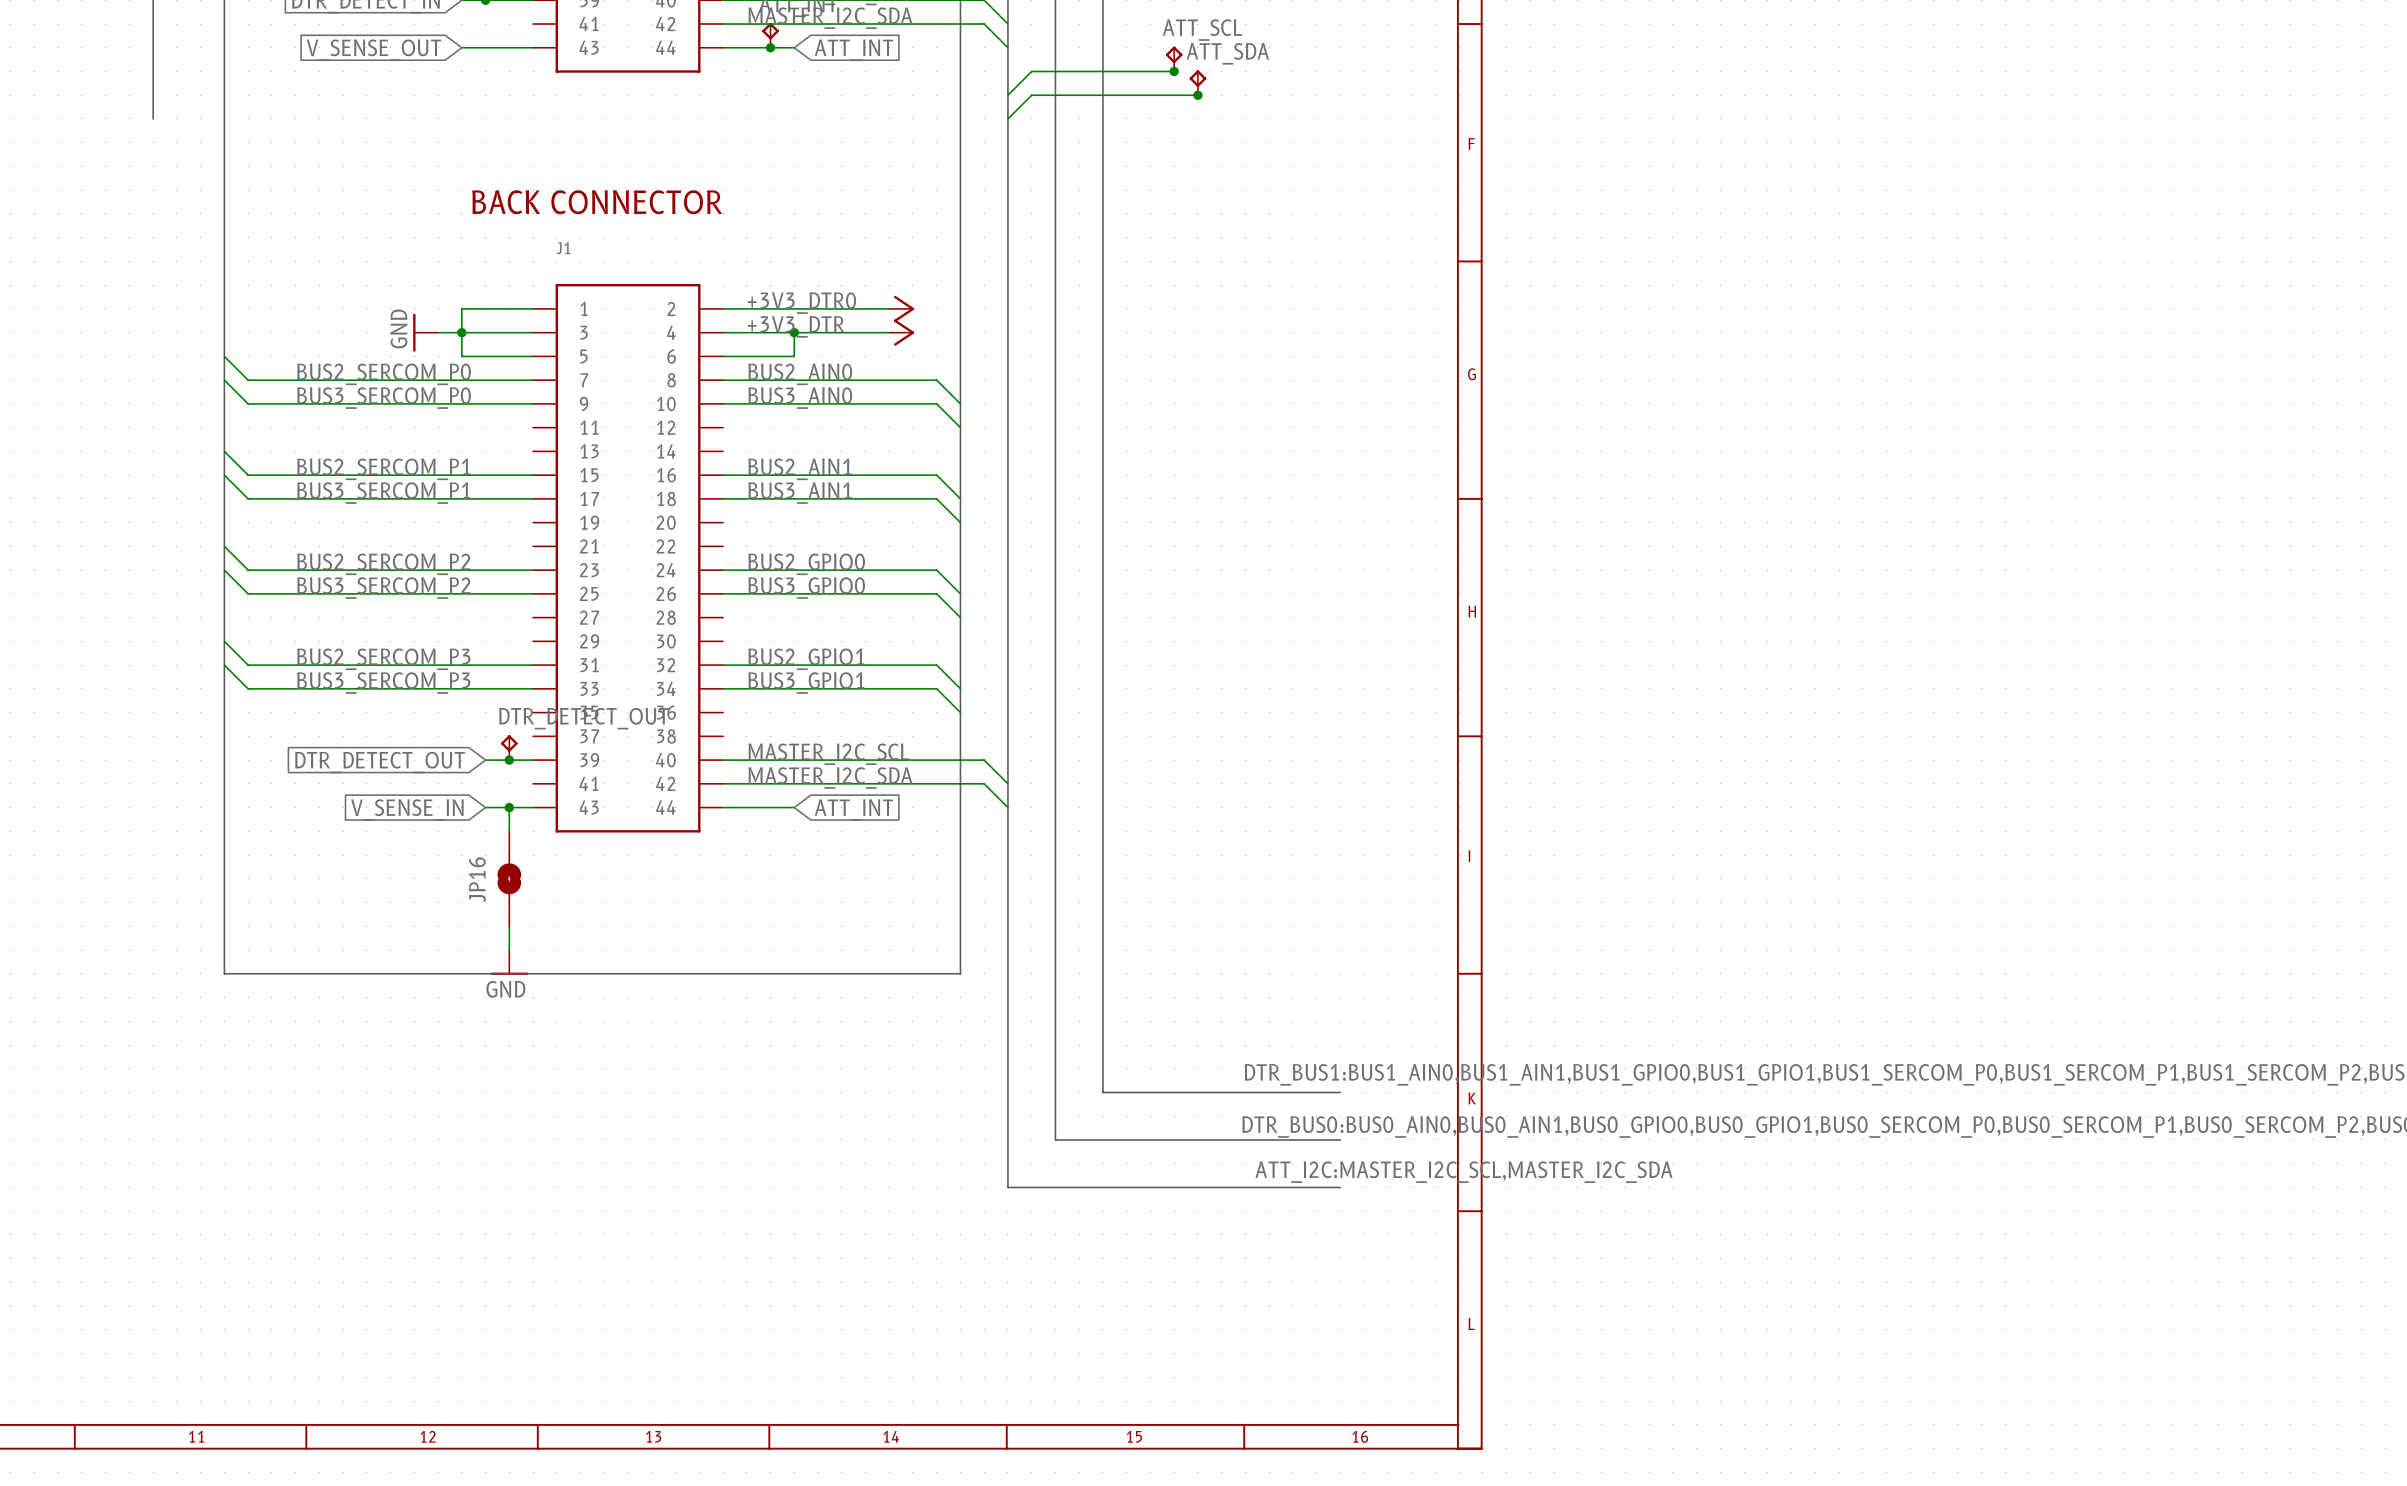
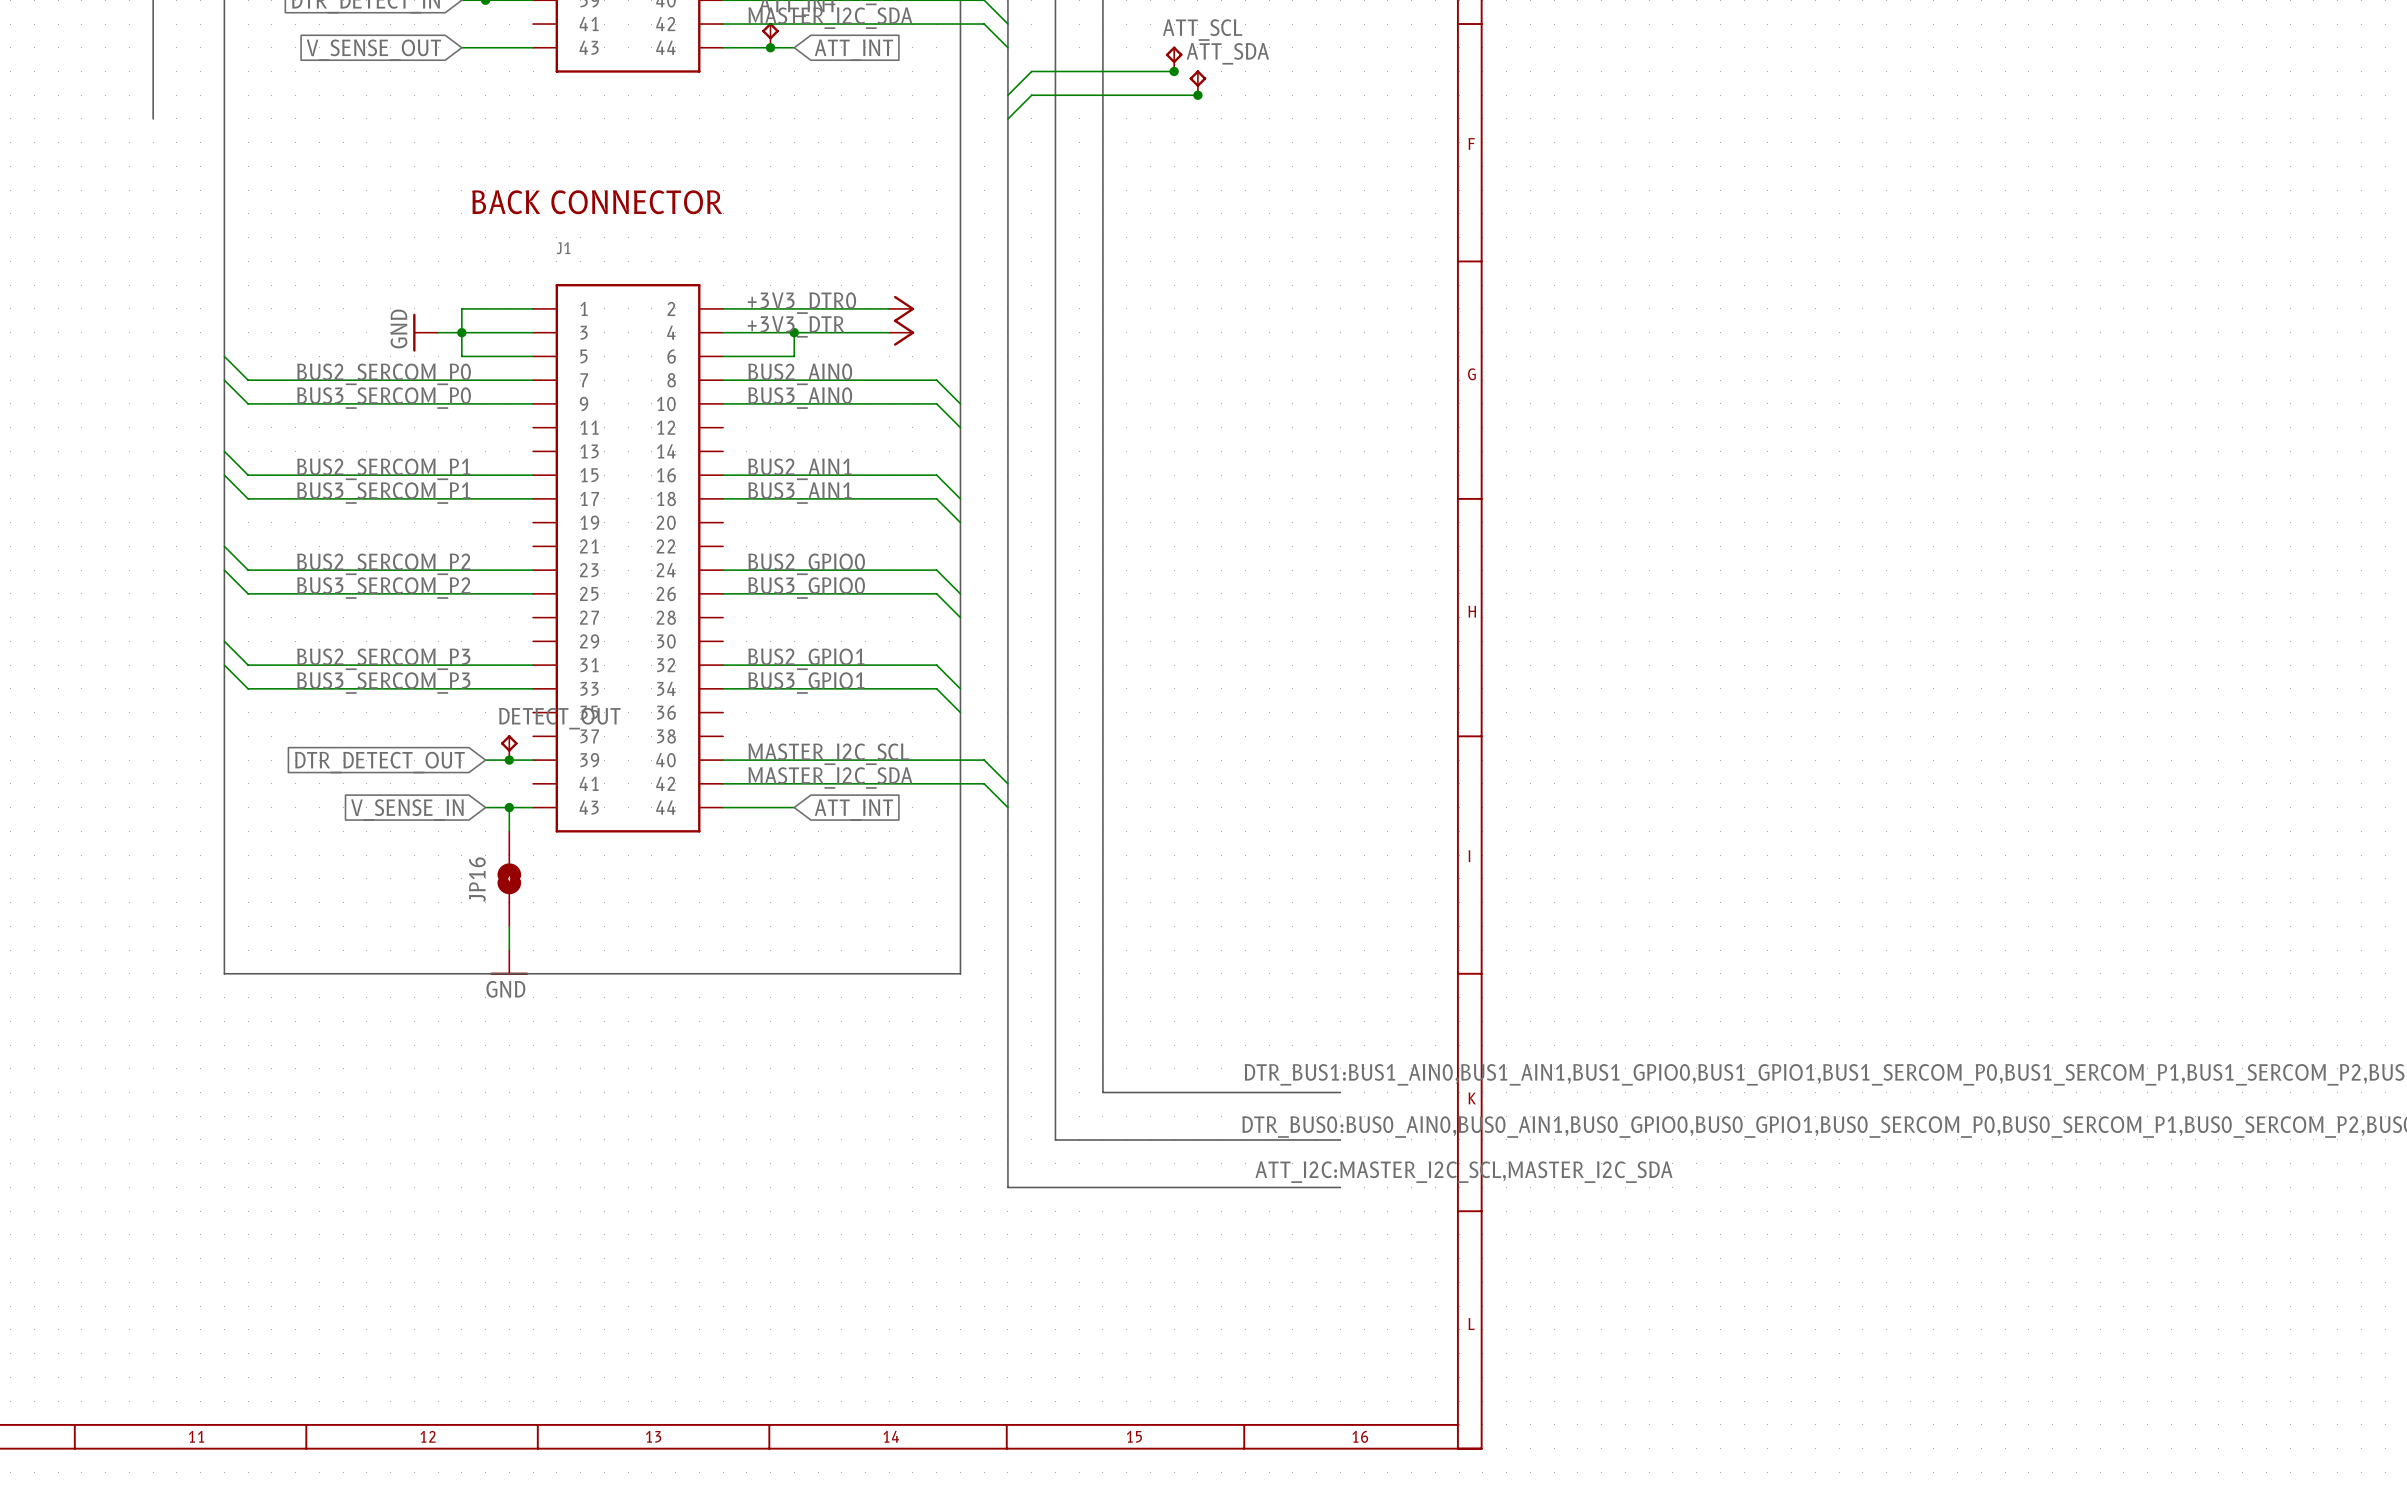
DTR_DETECT_OUT name: DTR_DETECT_OUT (583, 718) -> DETECT_OUT (559, 718)

